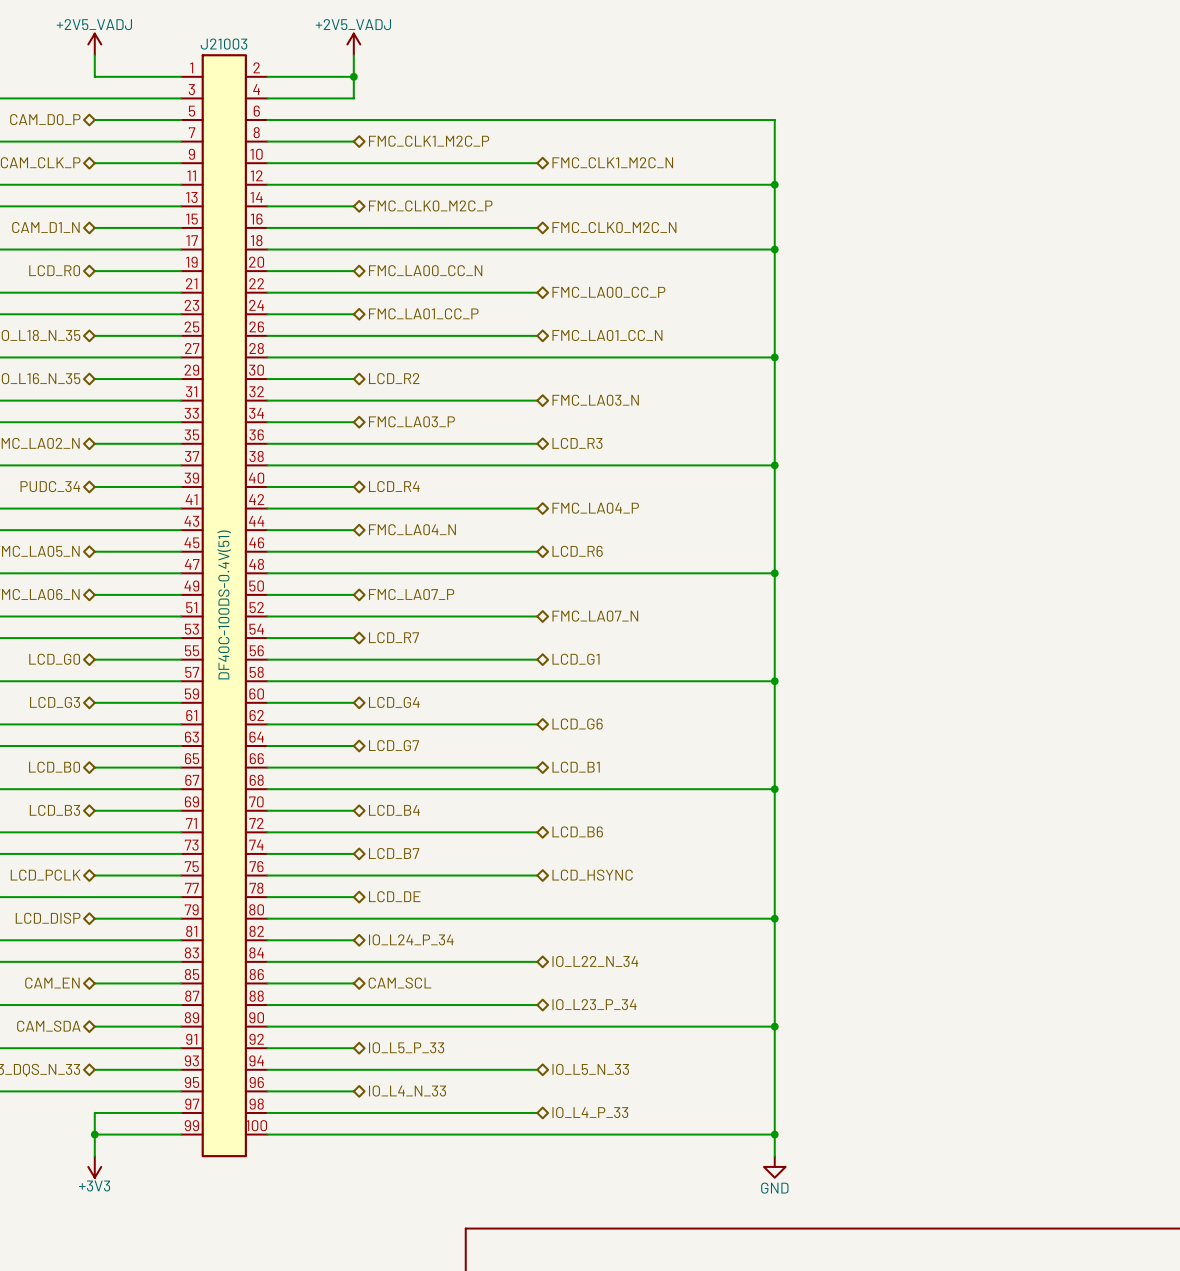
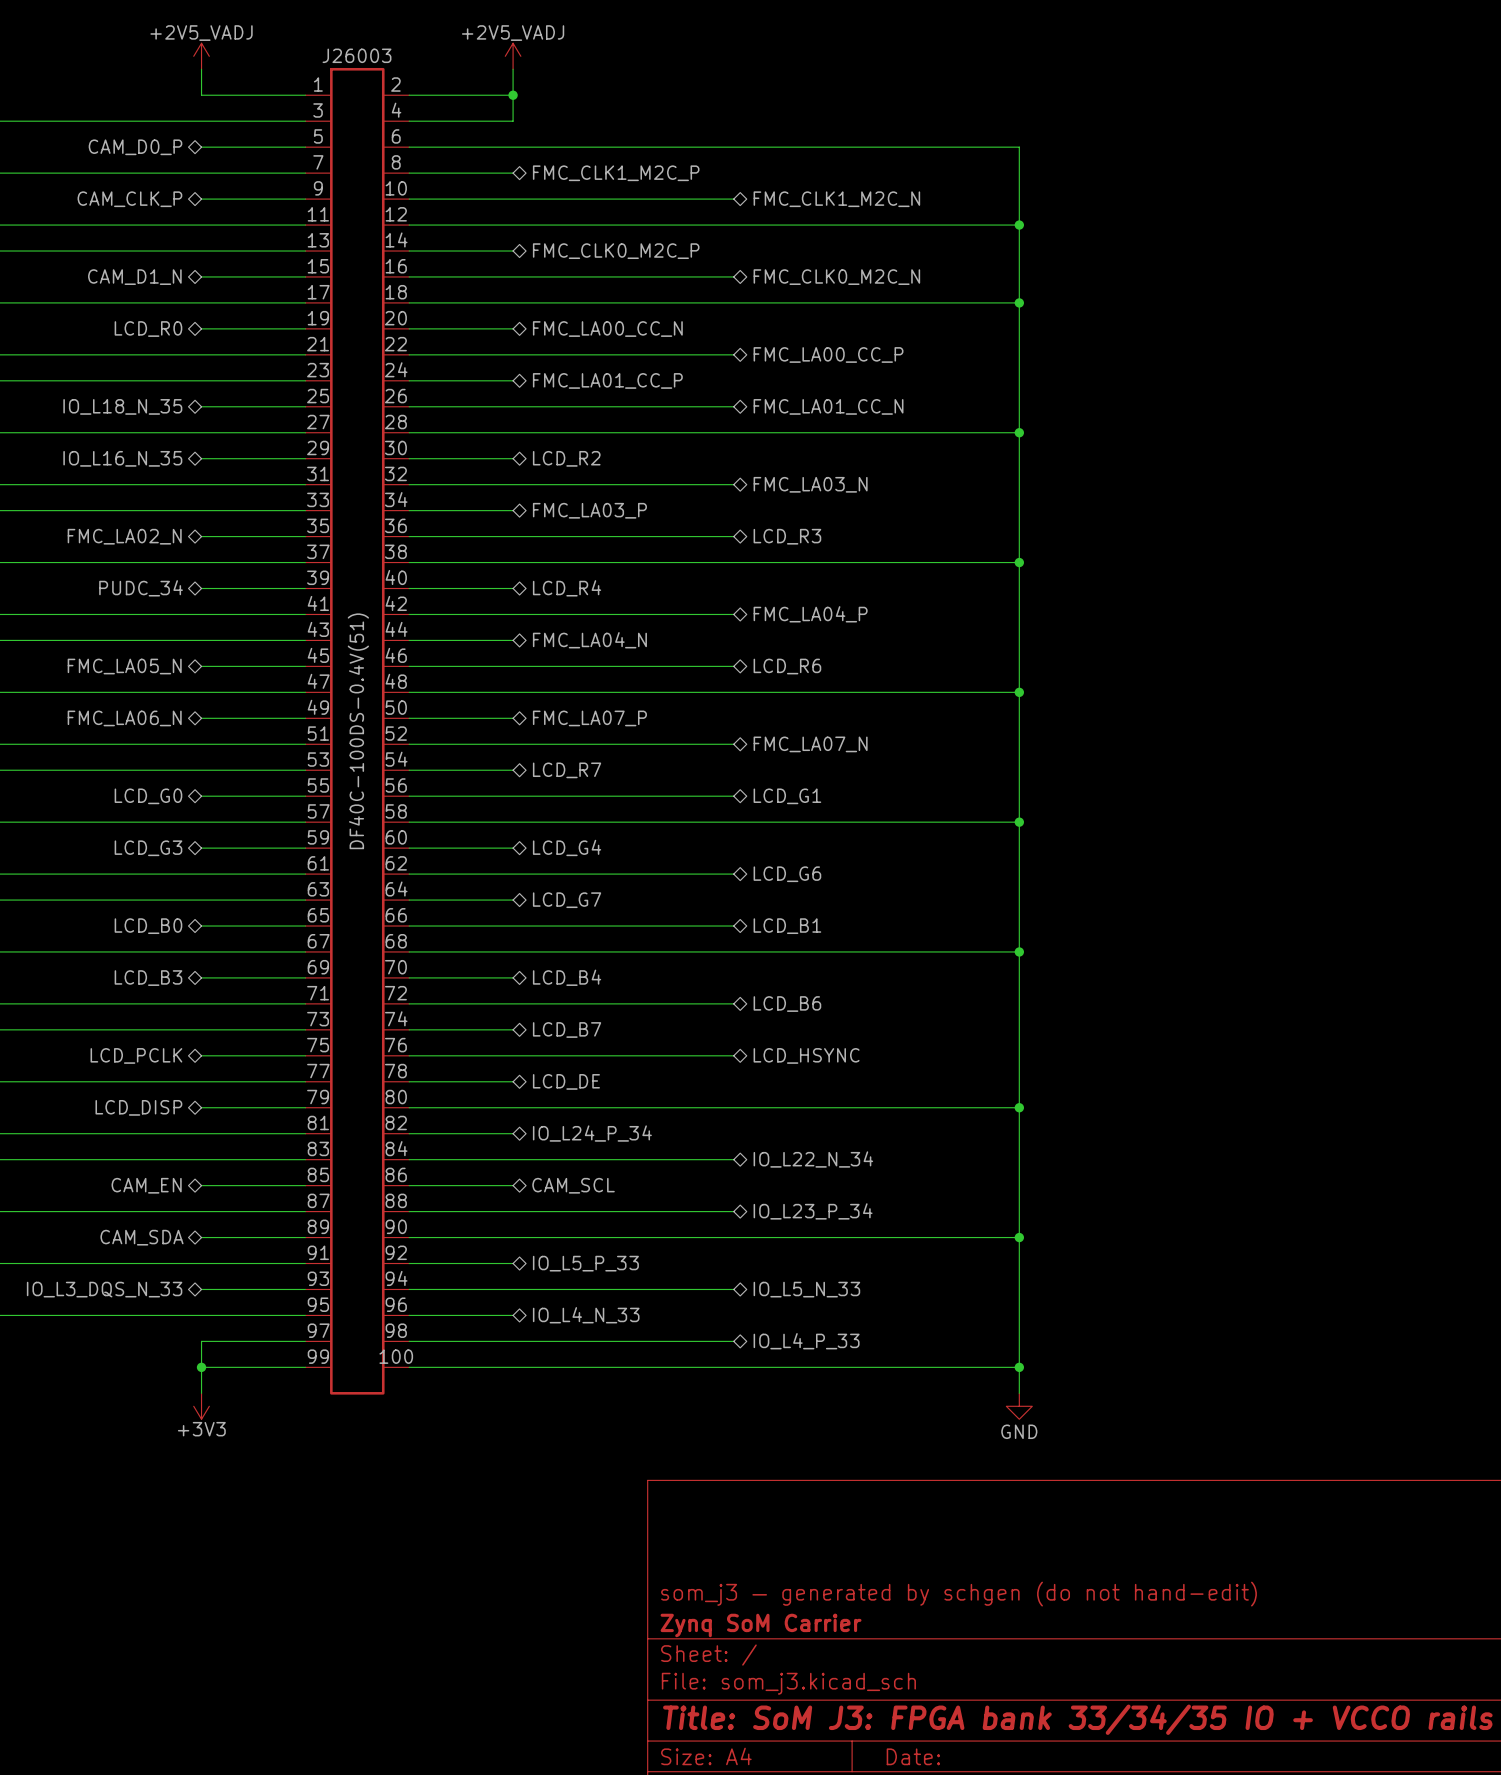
J21003 name: J21003 (224, 44) -> J26003 (356, 55)

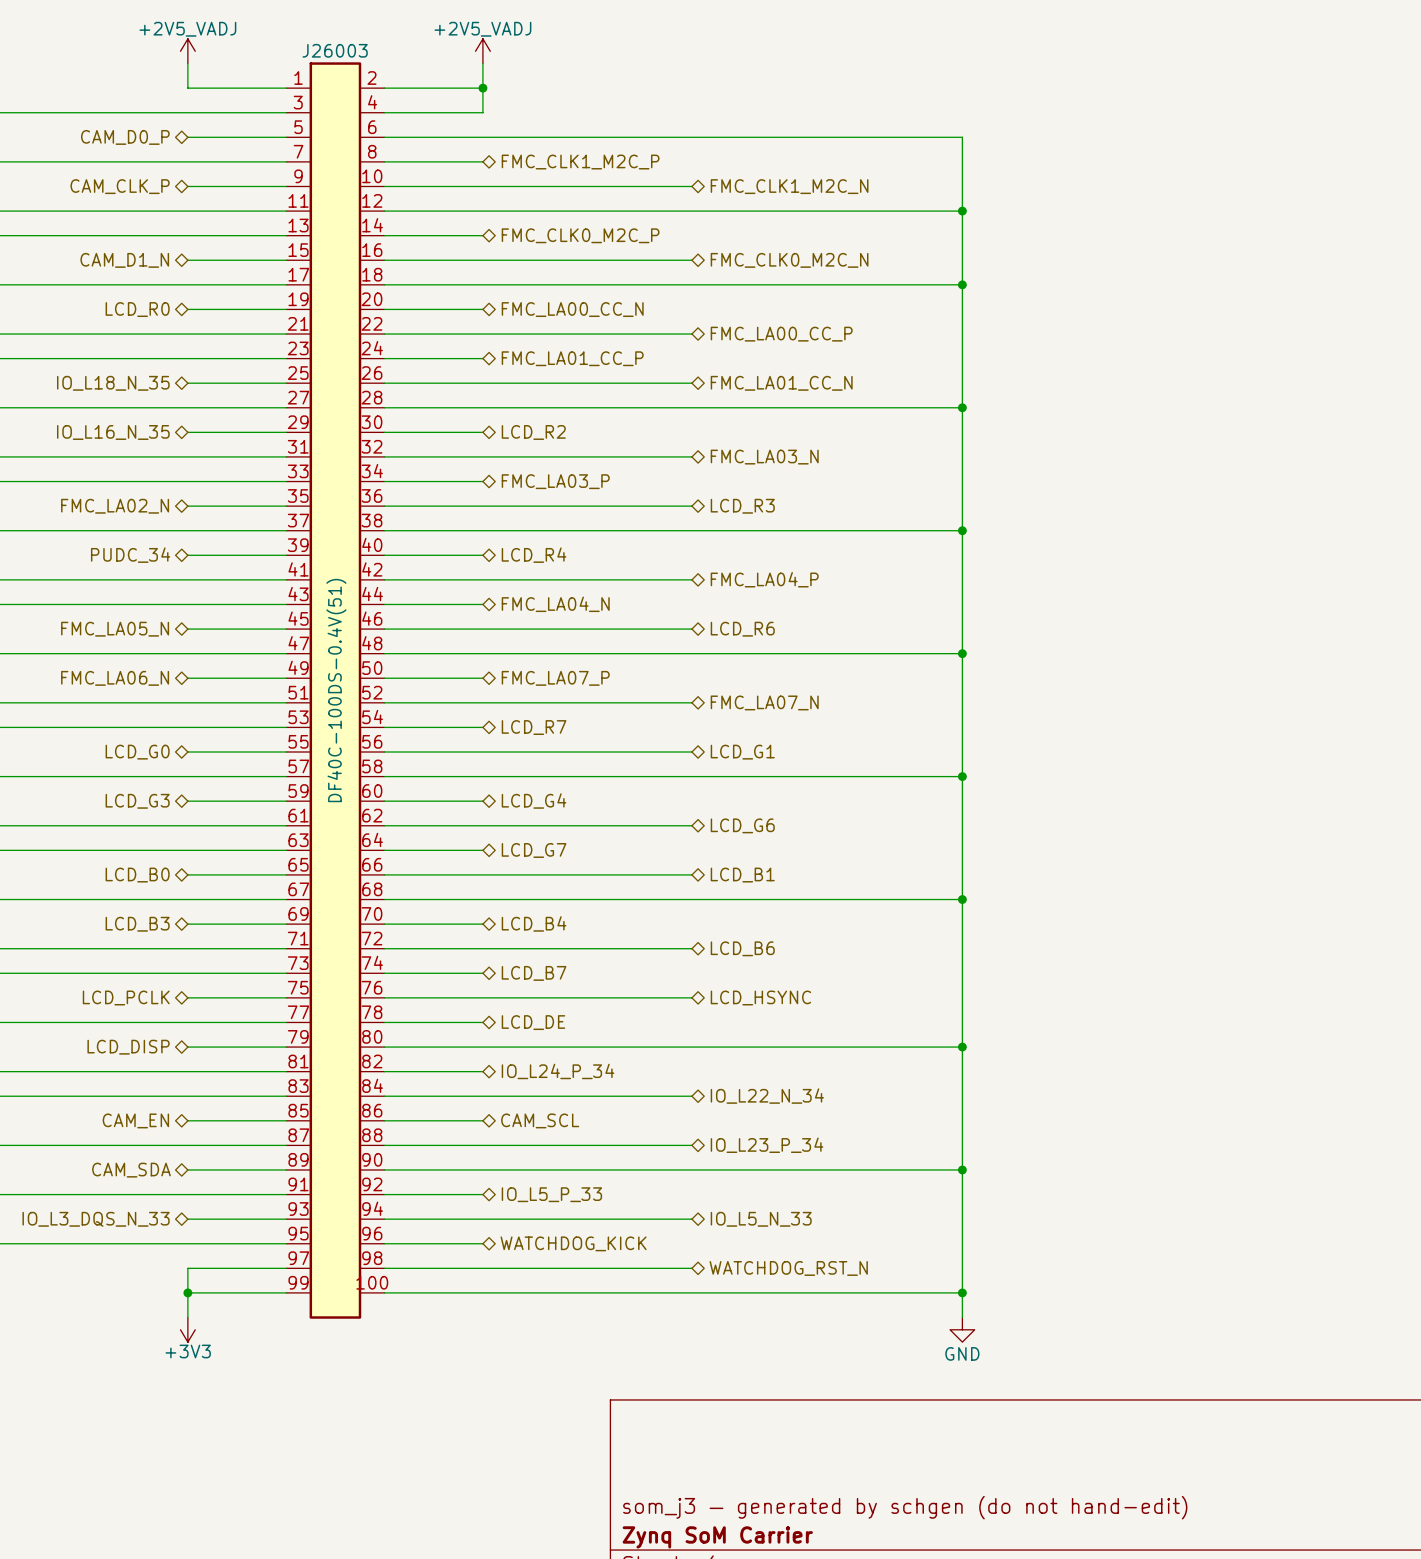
hierarchical label: IO_L4_N_33 (586, 1315) -> WATCHDOG_KICK (573, 1243)
hierarchical label: IO_L4_P_33 (806, 1341) -> WATCHDOG_RST_N (788, 1268)

